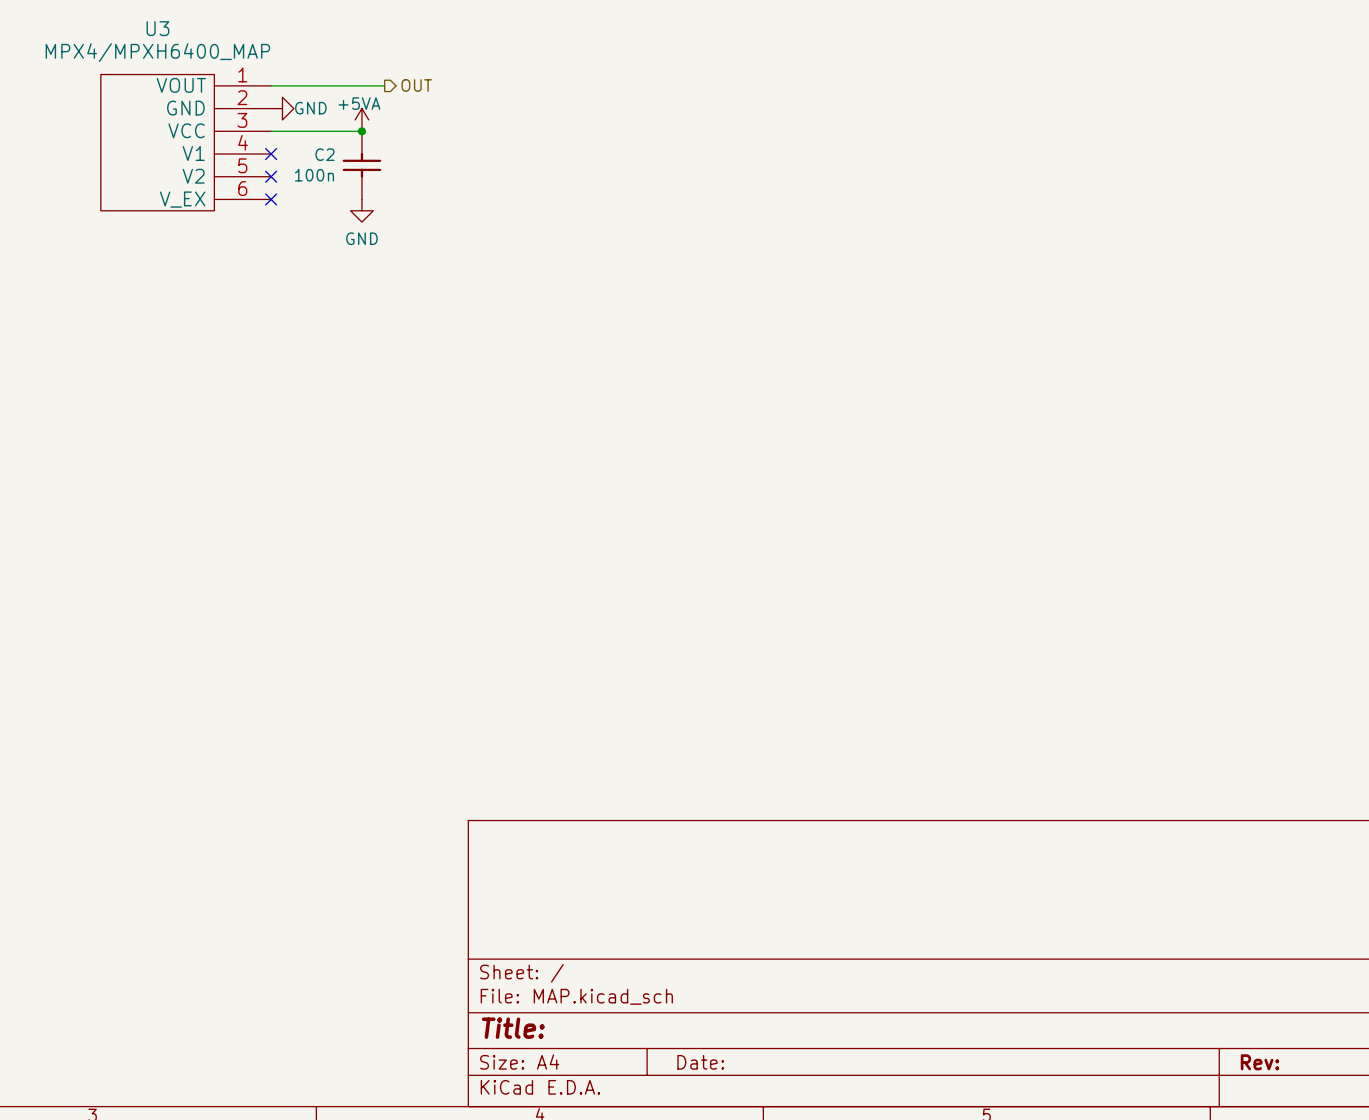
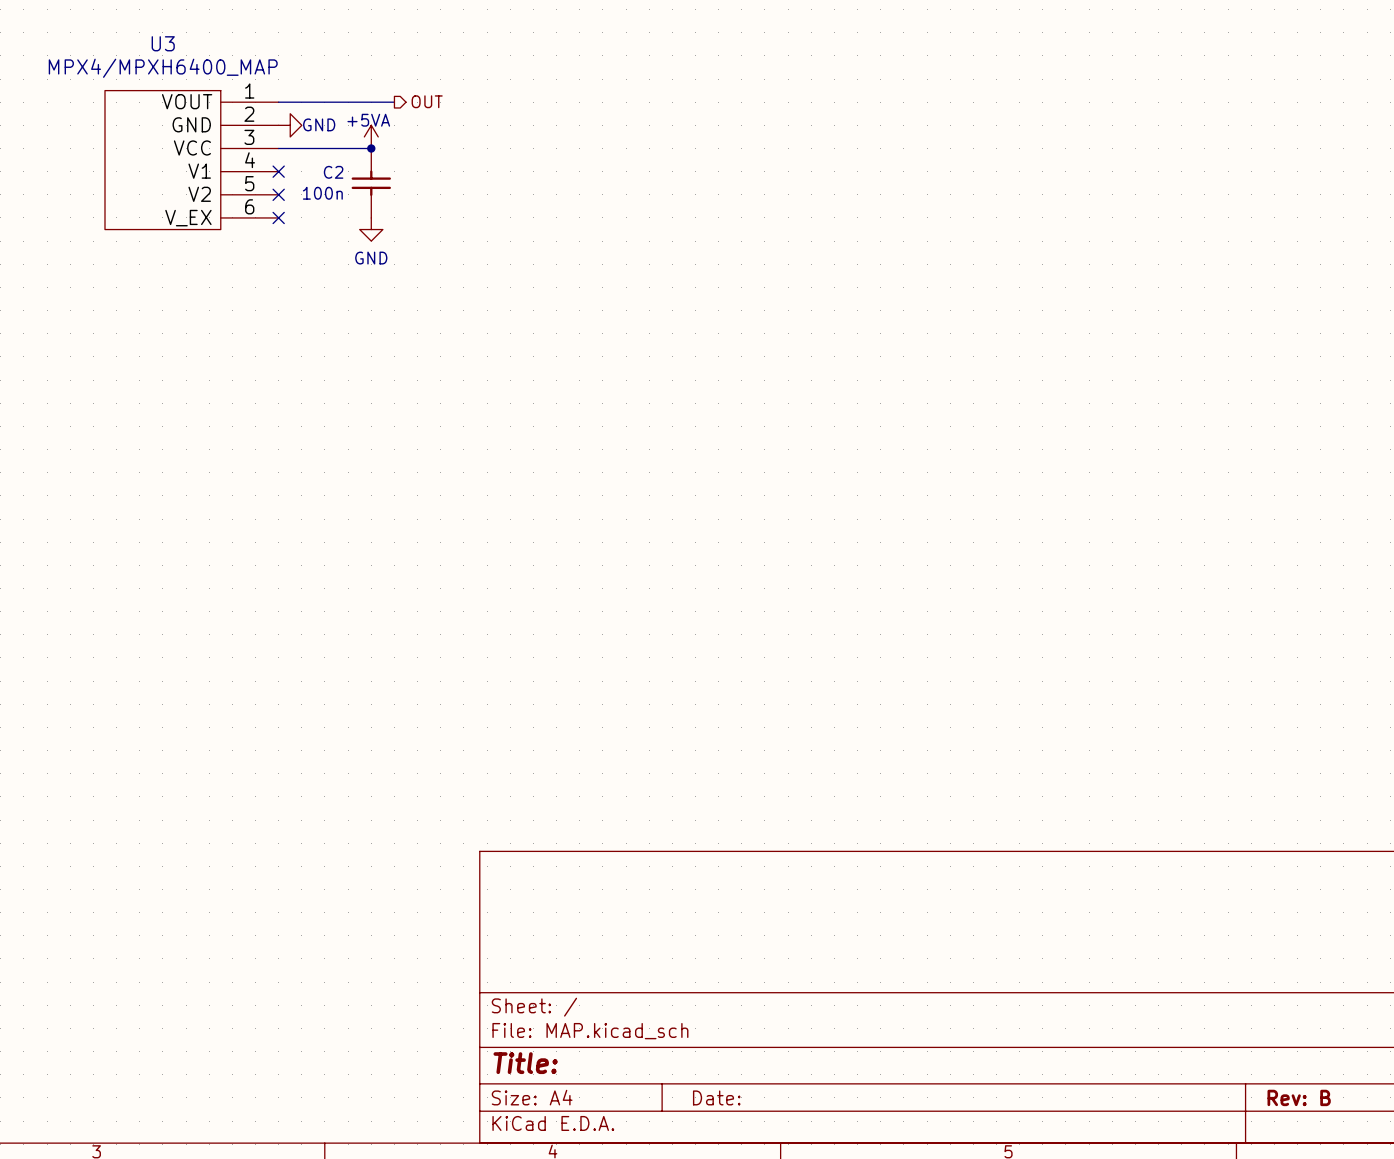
title block: Rev: (1259, 1062) -> Rev: B (1299, 1097)

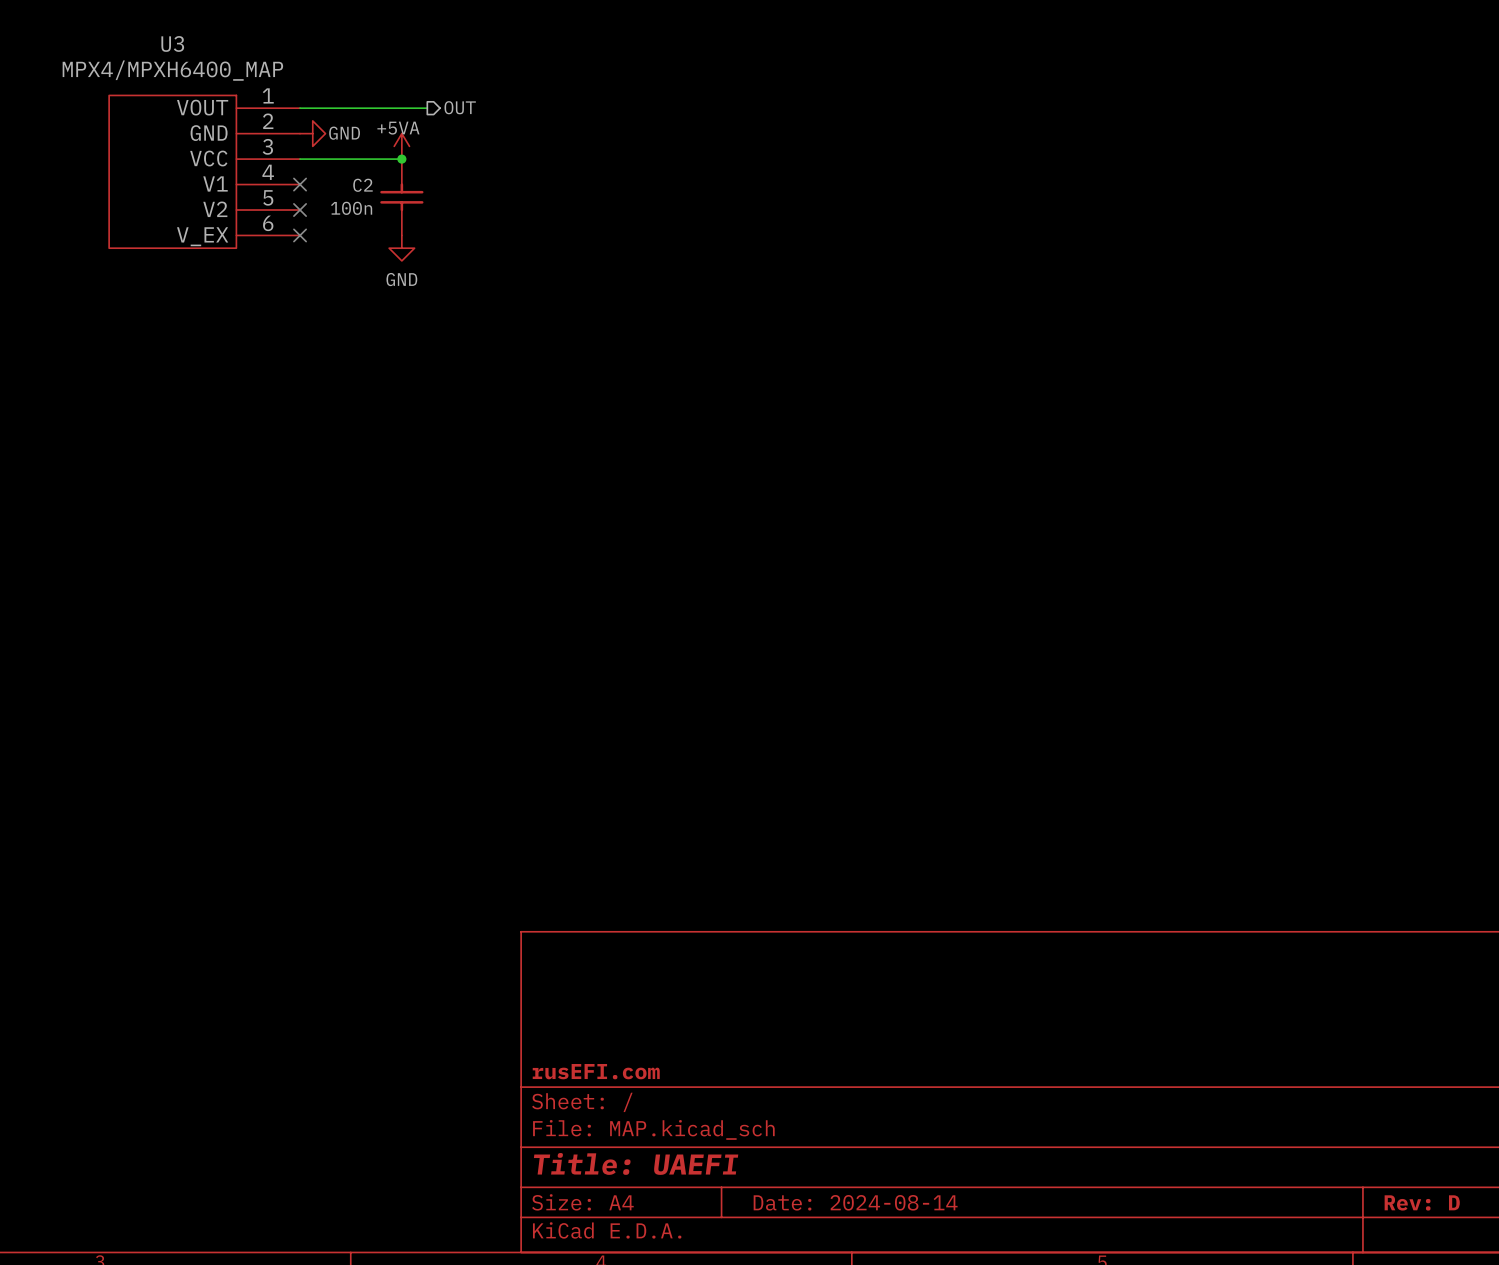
title block: none -> rusEFI.com (596, 1071)
title block: Title: (525, 1063) -> Title: UAEFI (636, 1163)
title block: Date: (716, 1097) -> Date: 2024-08-14 (855, 1202)
title block: Rev: B (1299, 1097) -> Rev: D (1422, 1202)

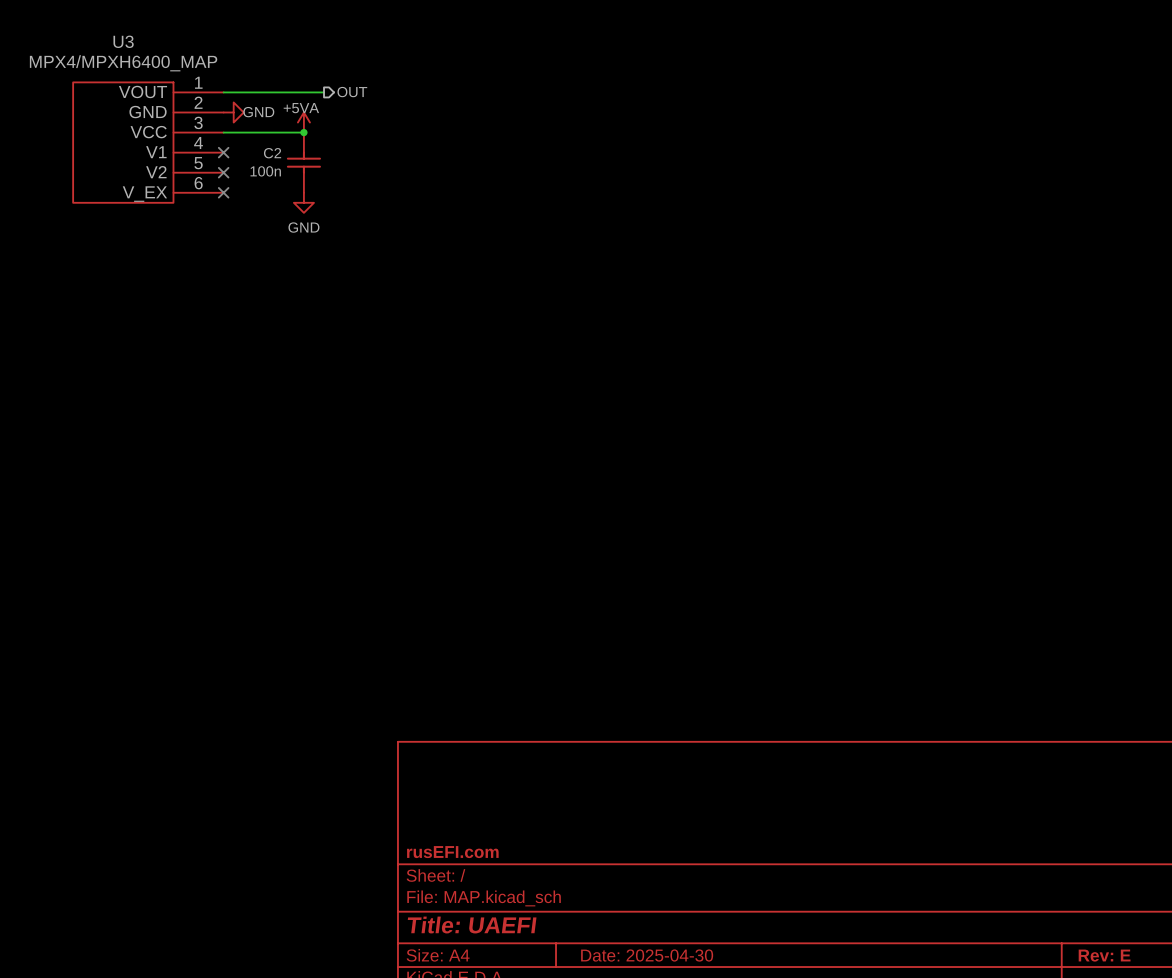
title block: Date: 2024-08-14 (855, 1202) -> Date: 2025-04-30 (647, 955)
title block: Rev: D (1422, 1202) -> Rev: E (1104, 955)

